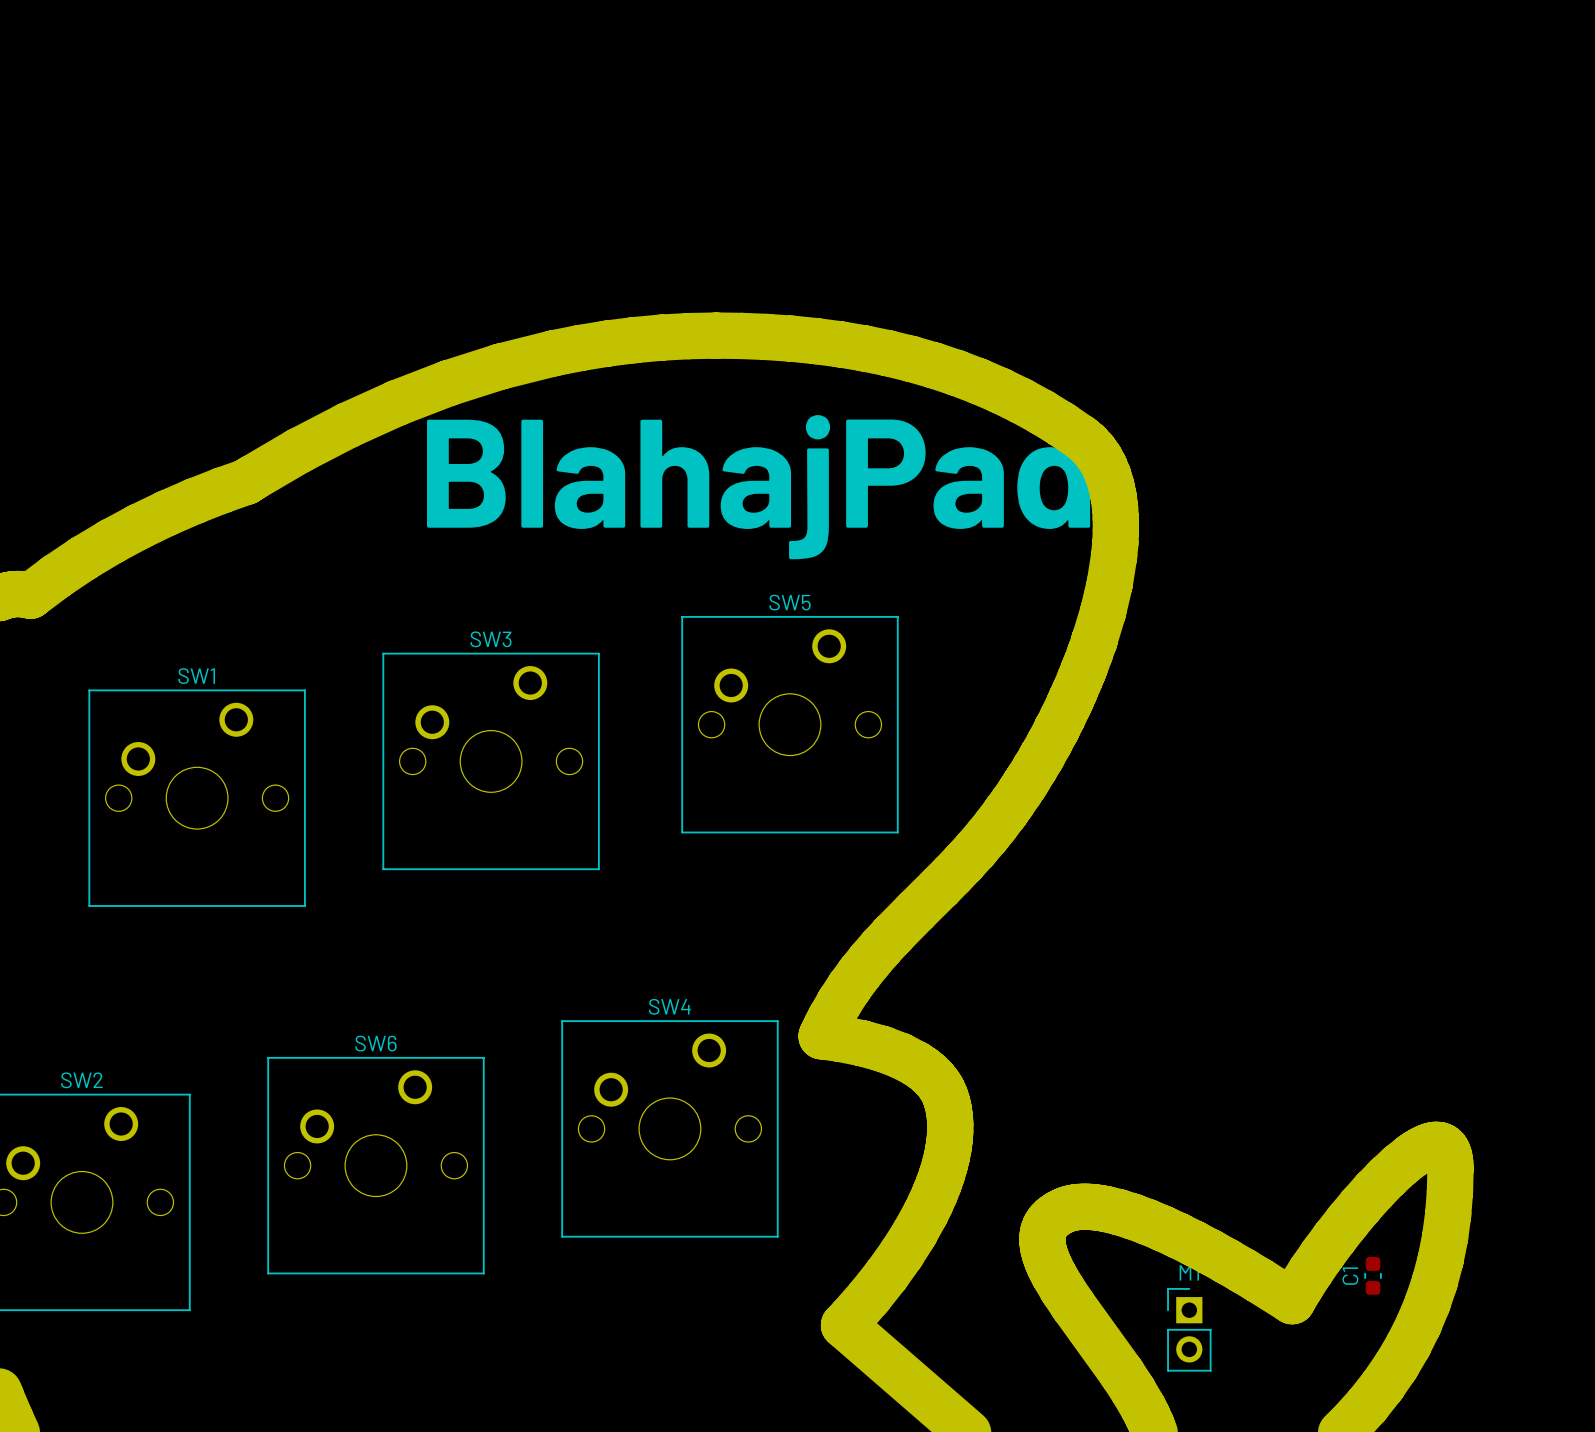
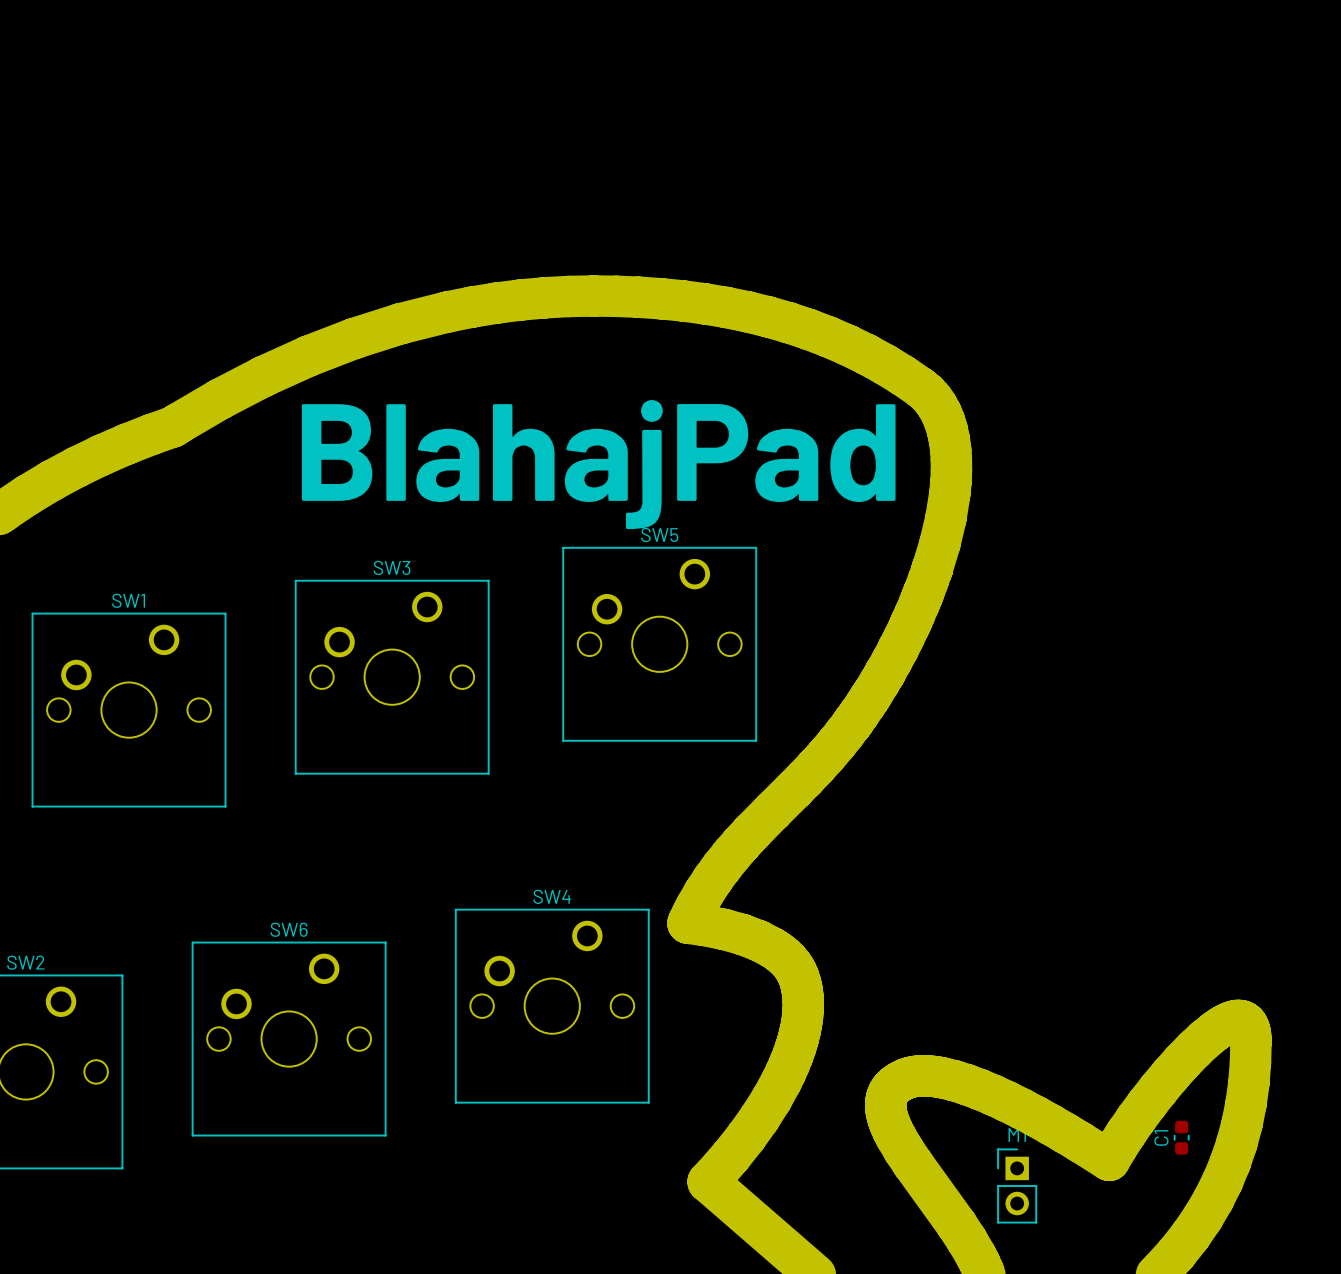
text position: BlahajPad (758, 487) -> BlahajPad (598, 464)

